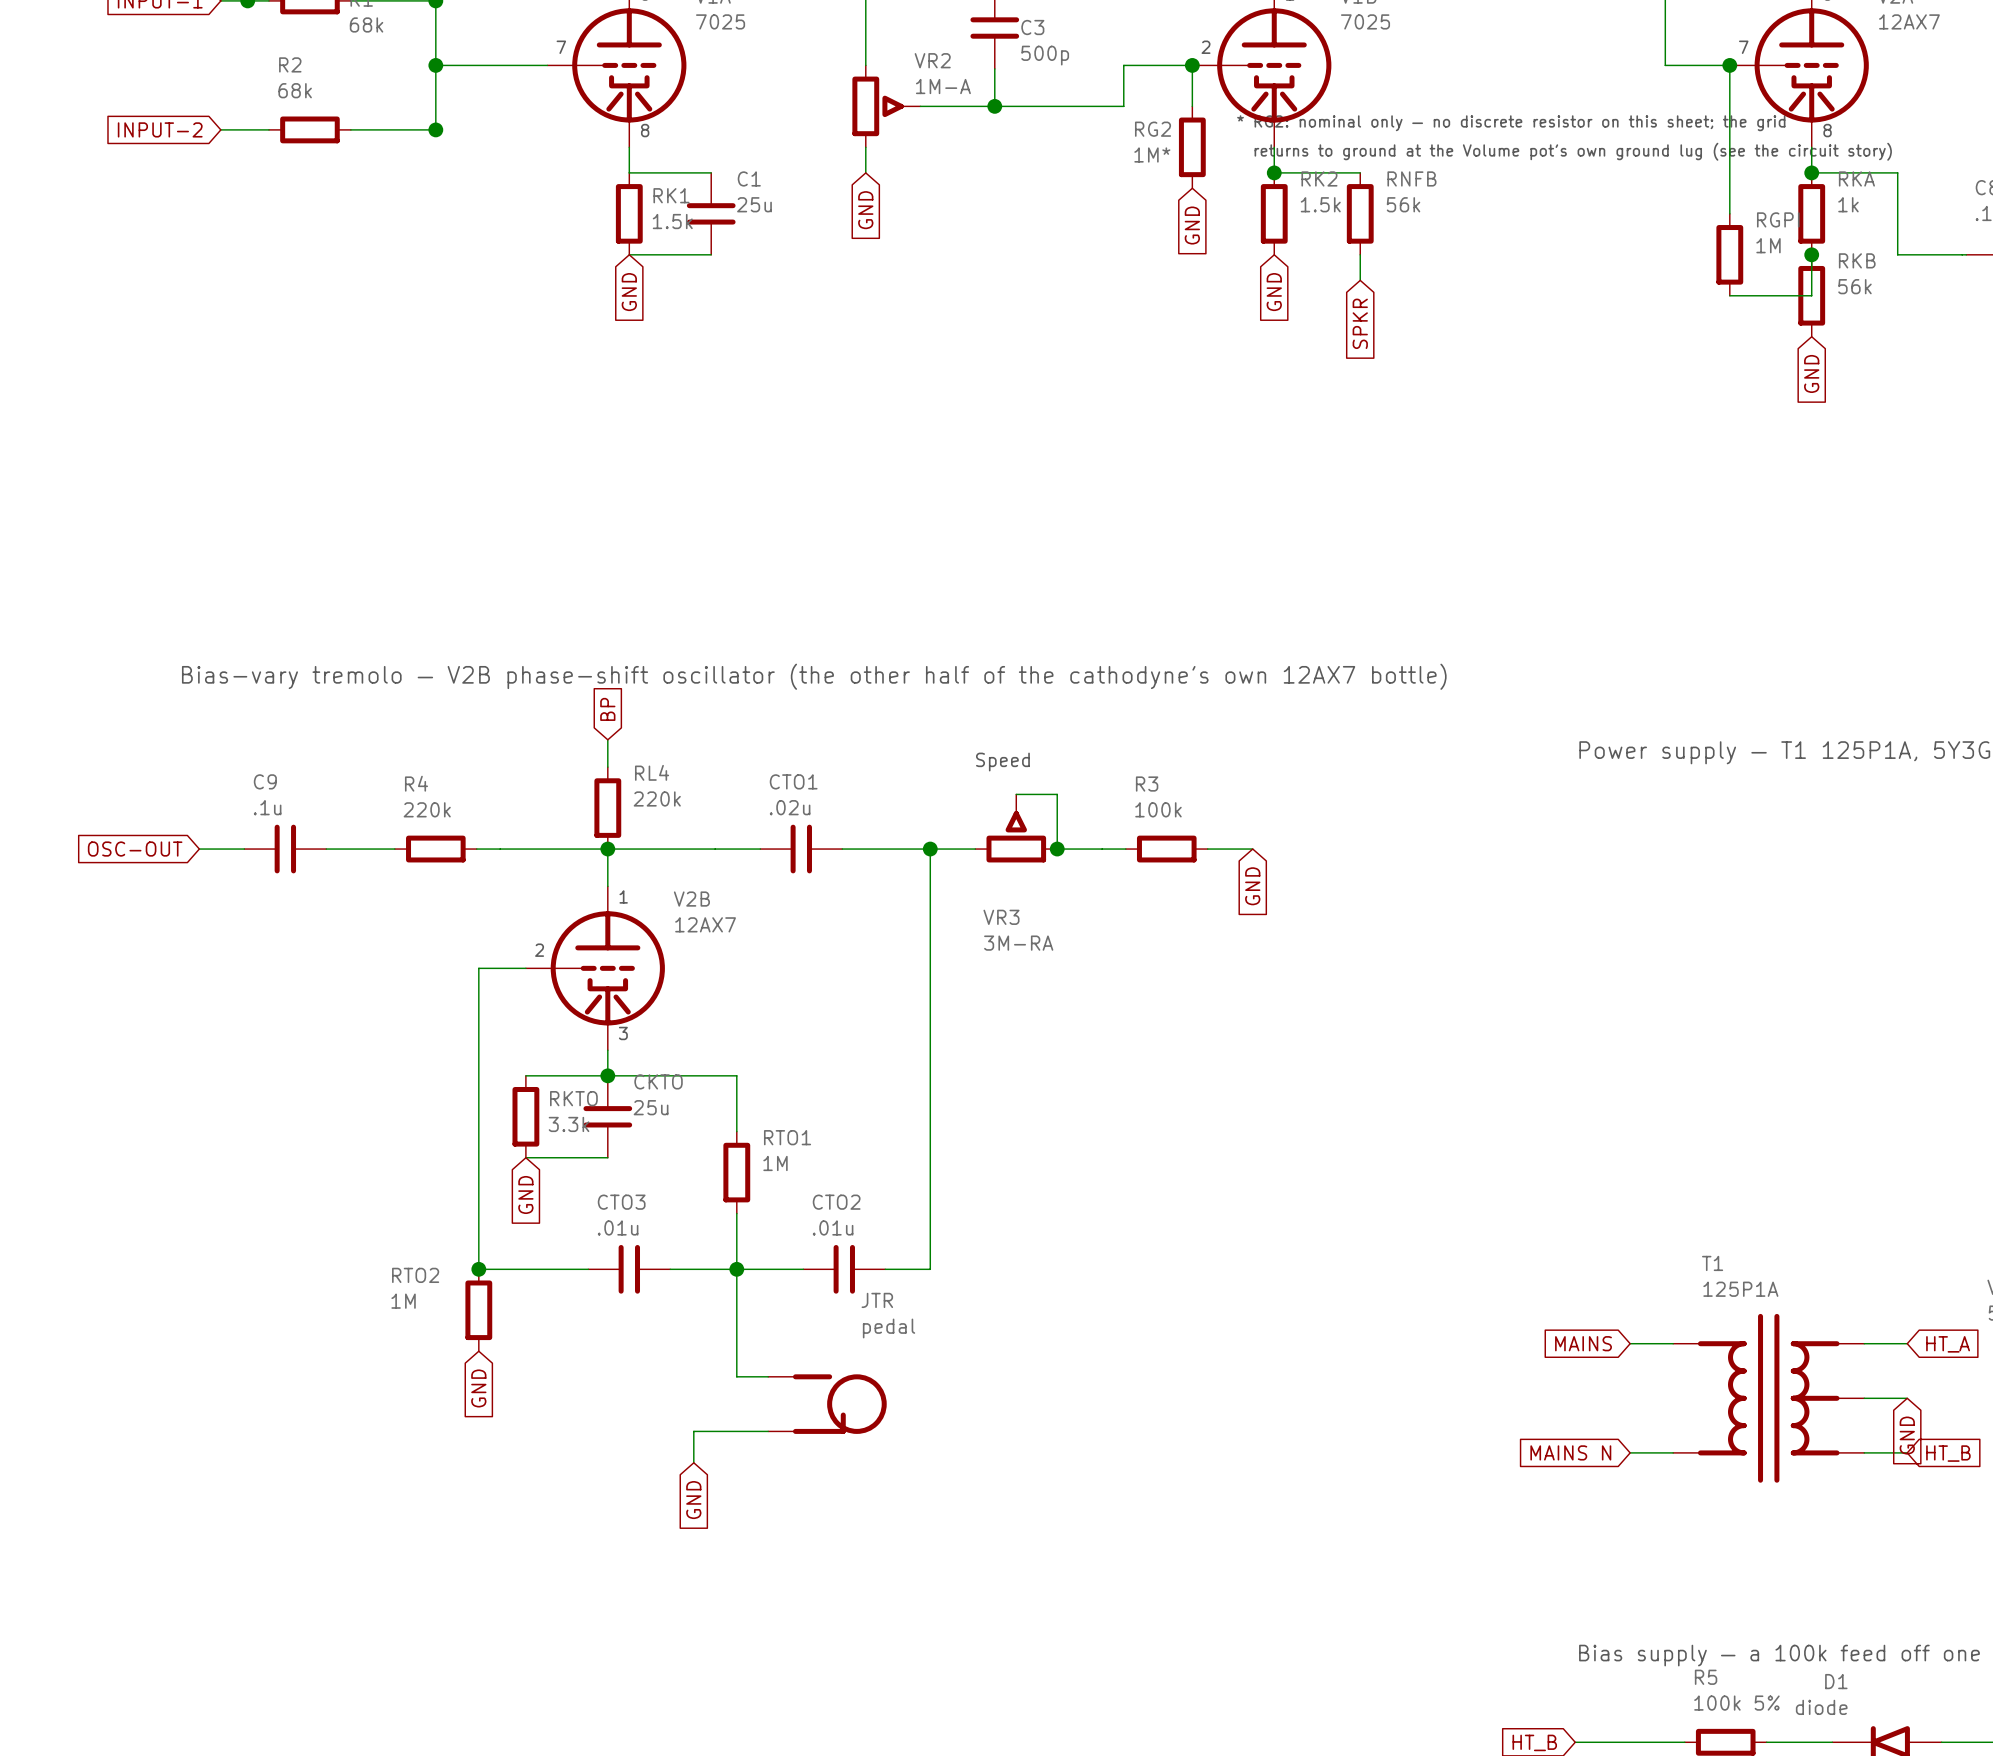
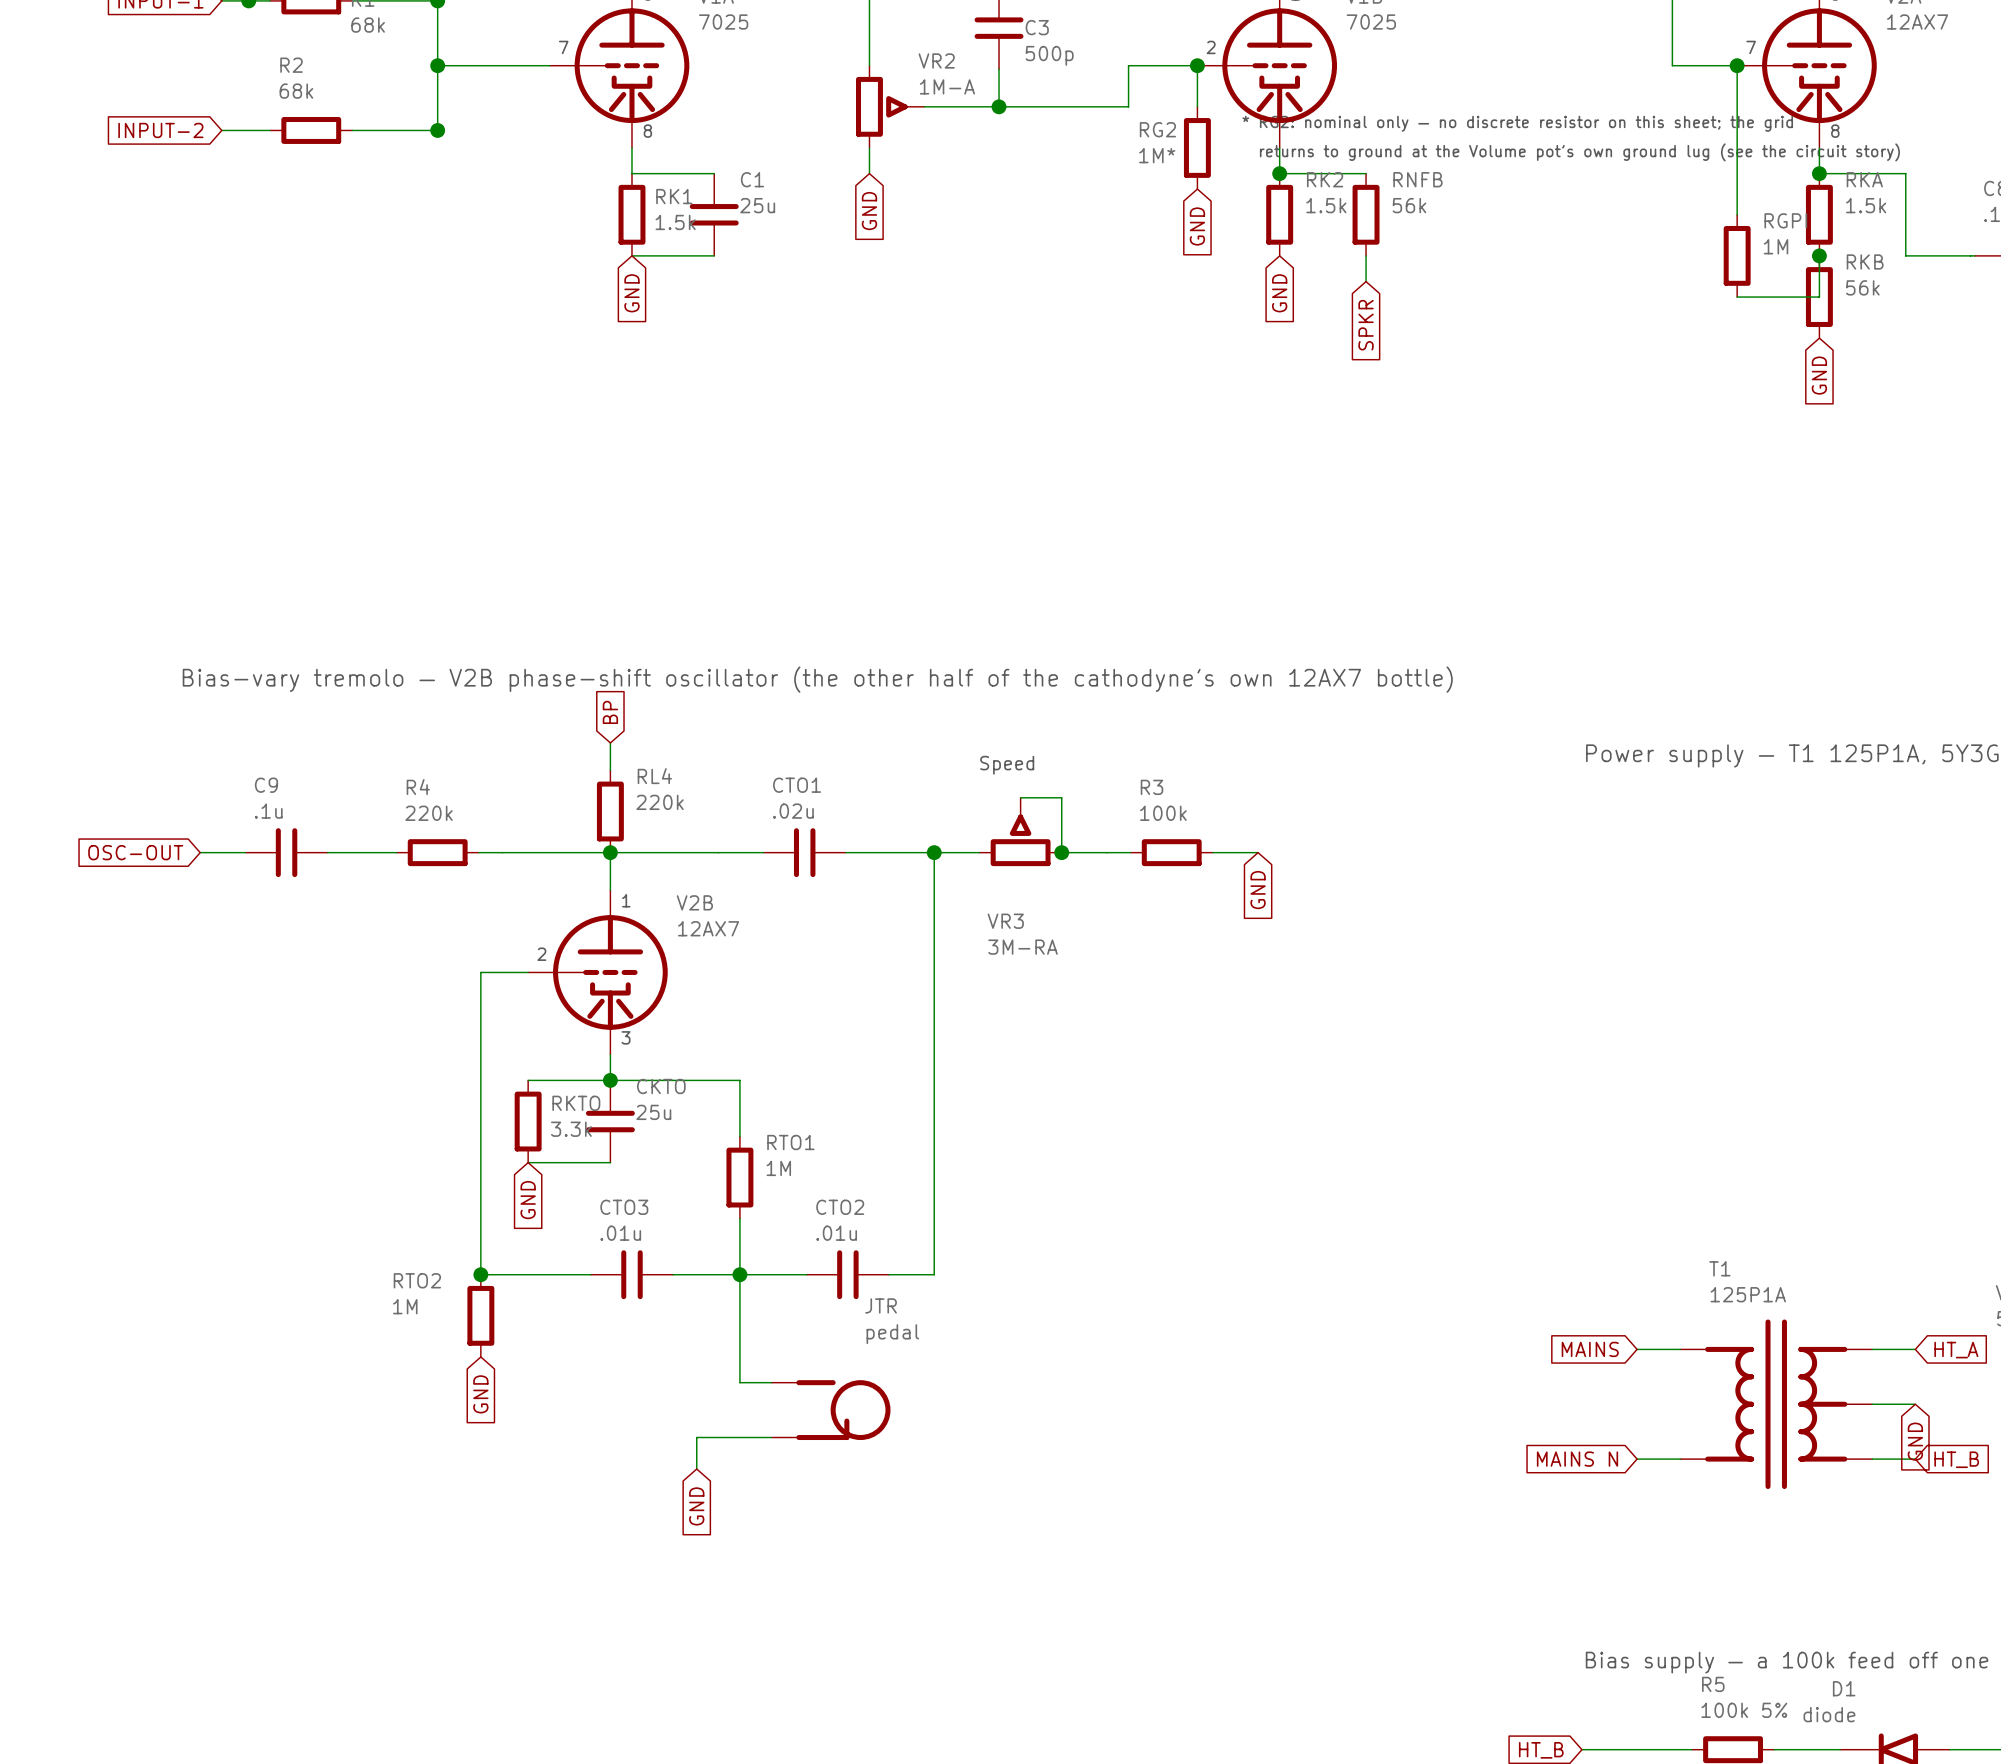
RKA value: 1k (1848, 204) -> 1.5k (1866, 205)

